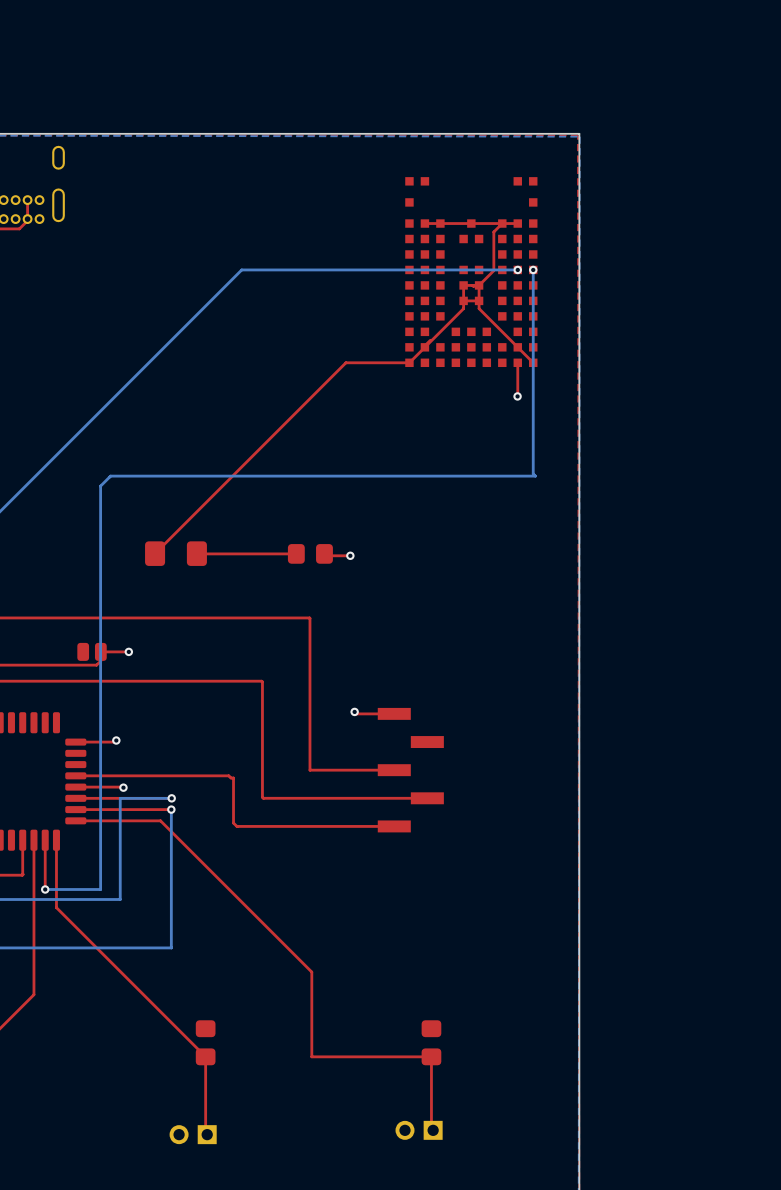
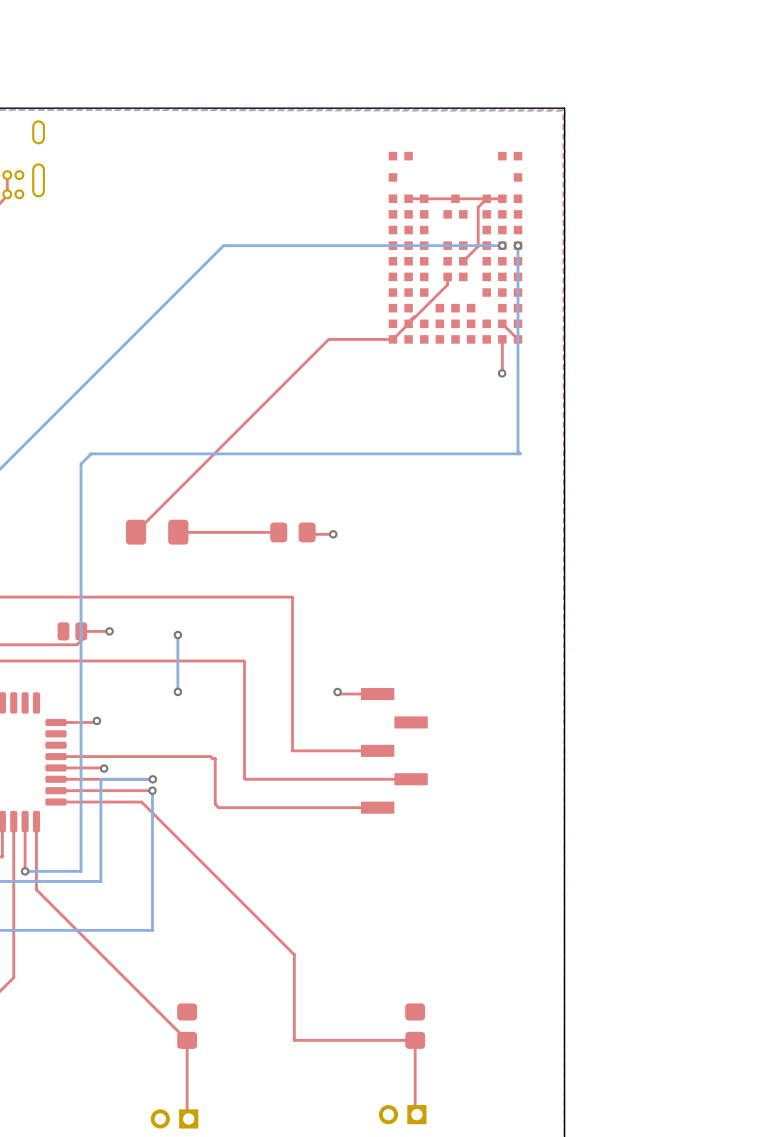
top track: (479, 300) (463, 300) (463, 285) (479, 285) (479, 308) (517, 347) -> none
bottom track: none -> (177, 635) (177, 691)
via: none -> (177, 635)
via: none -> (177, 691)

